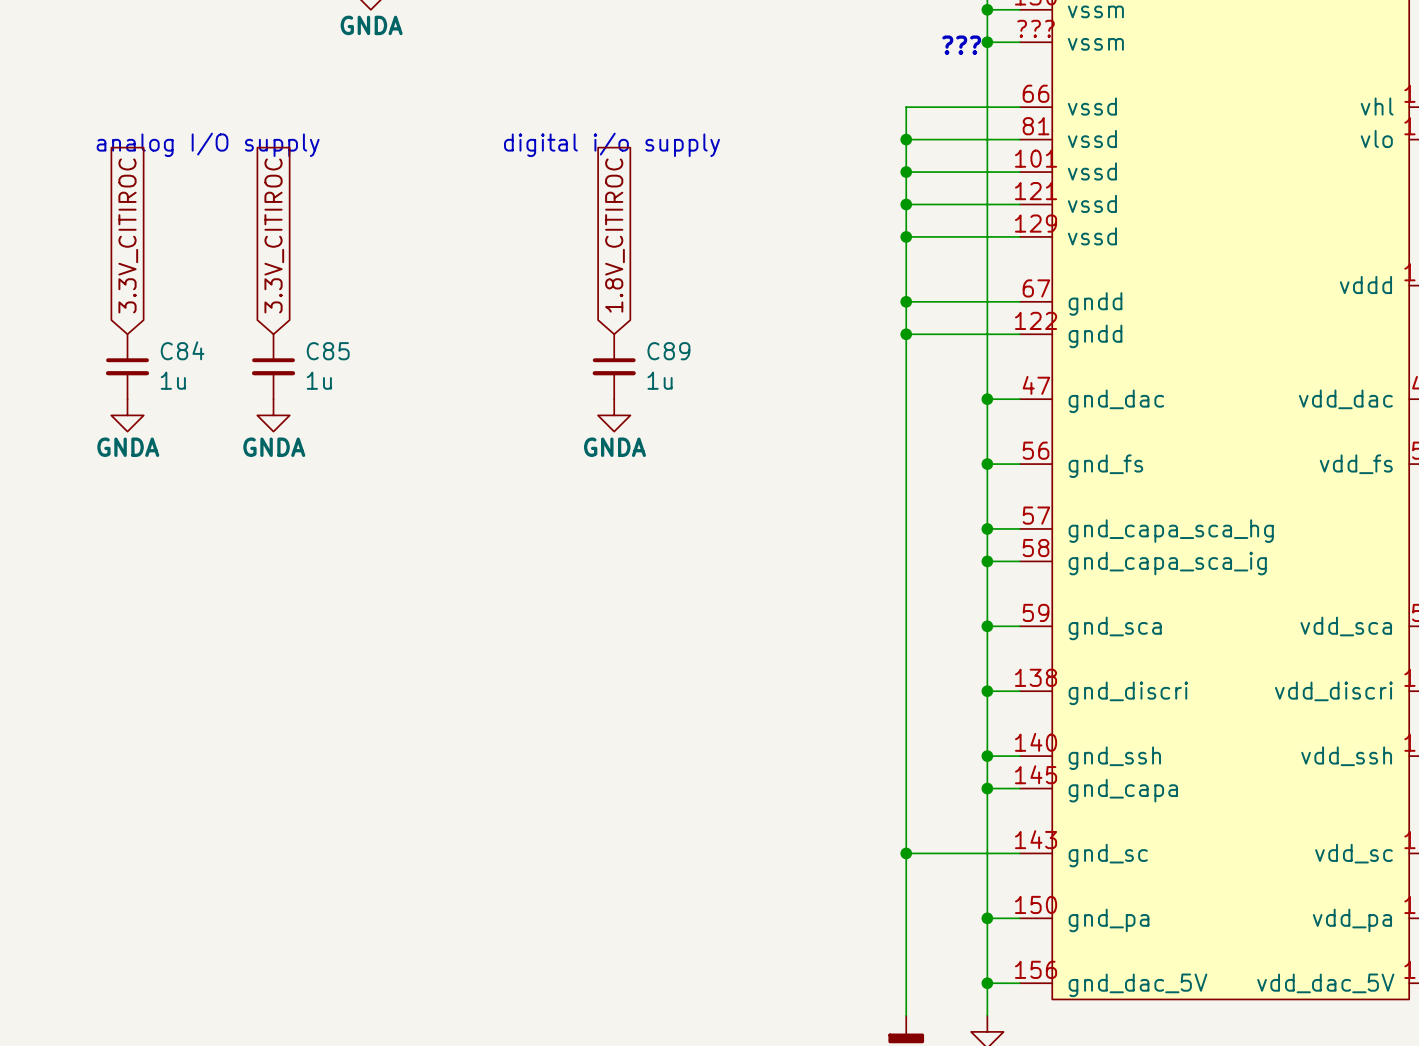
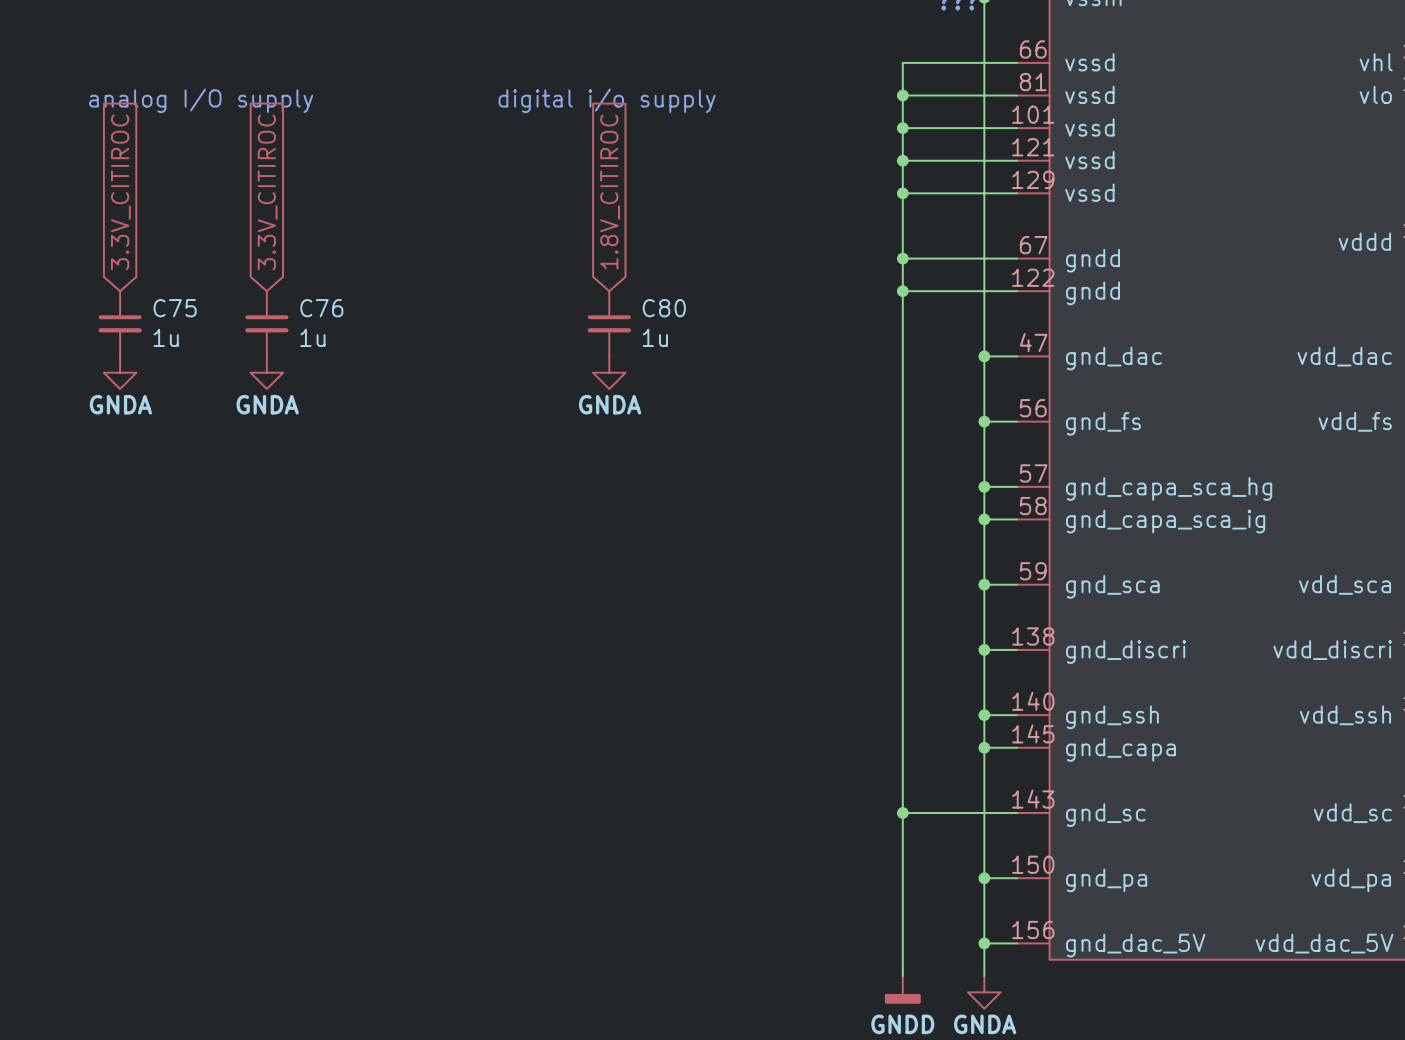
C84 name: C84 (182, 350) -> C75 (175, 308)
C85 name: C85 (328, 351) -> C76 (321, 308)
C89 name: C89 (668, 351) -> C80 (664, 308)

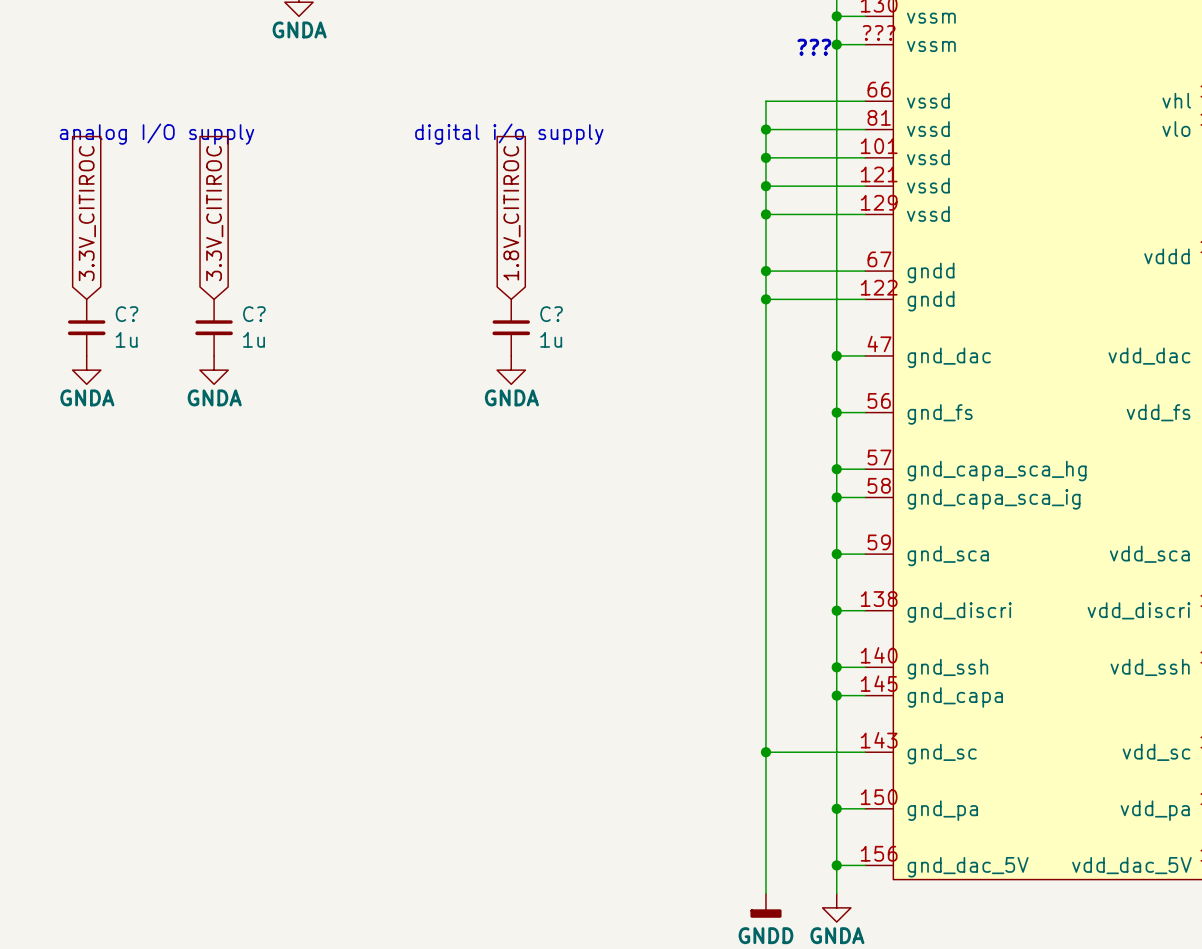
C75 name: C75 (175, 308) -> C? (127, 314)
C76 name: C76 (321, 308) -> C? (254, 314)
C80 name: C80 (664, 308) -> C? (551, 314)

